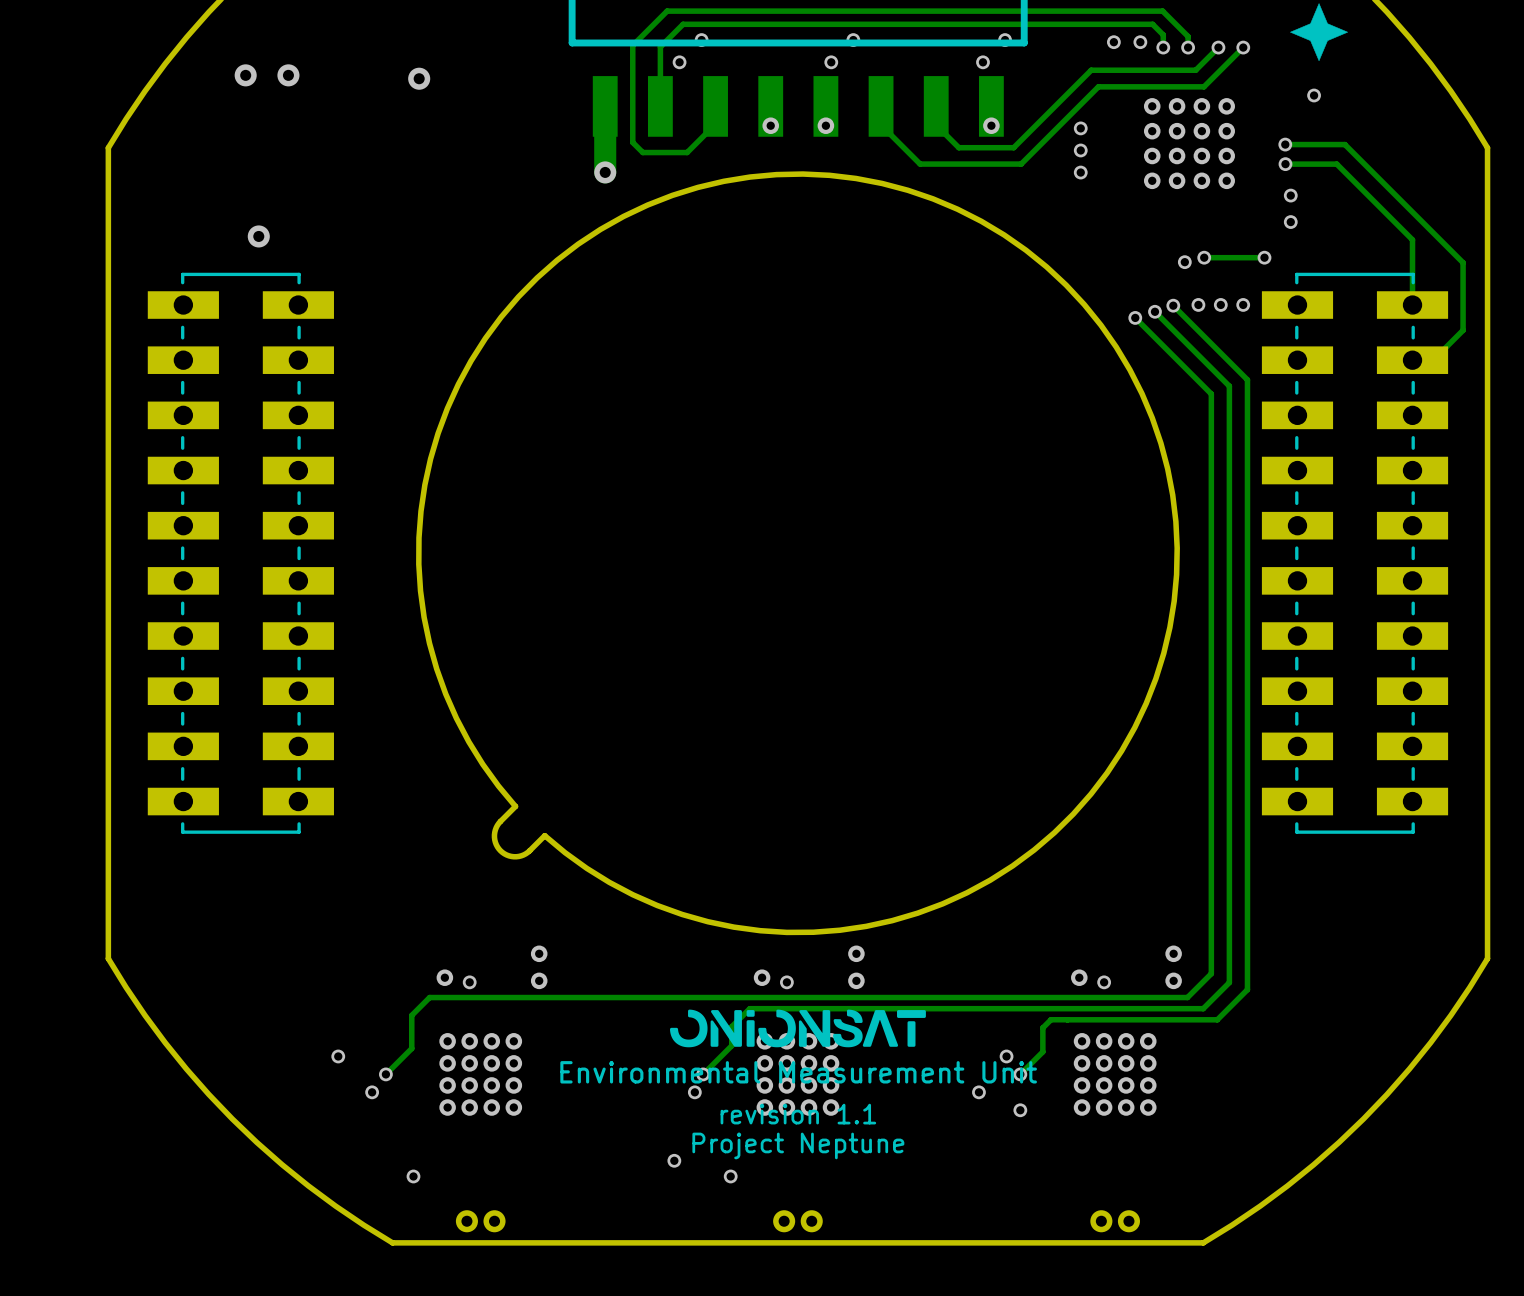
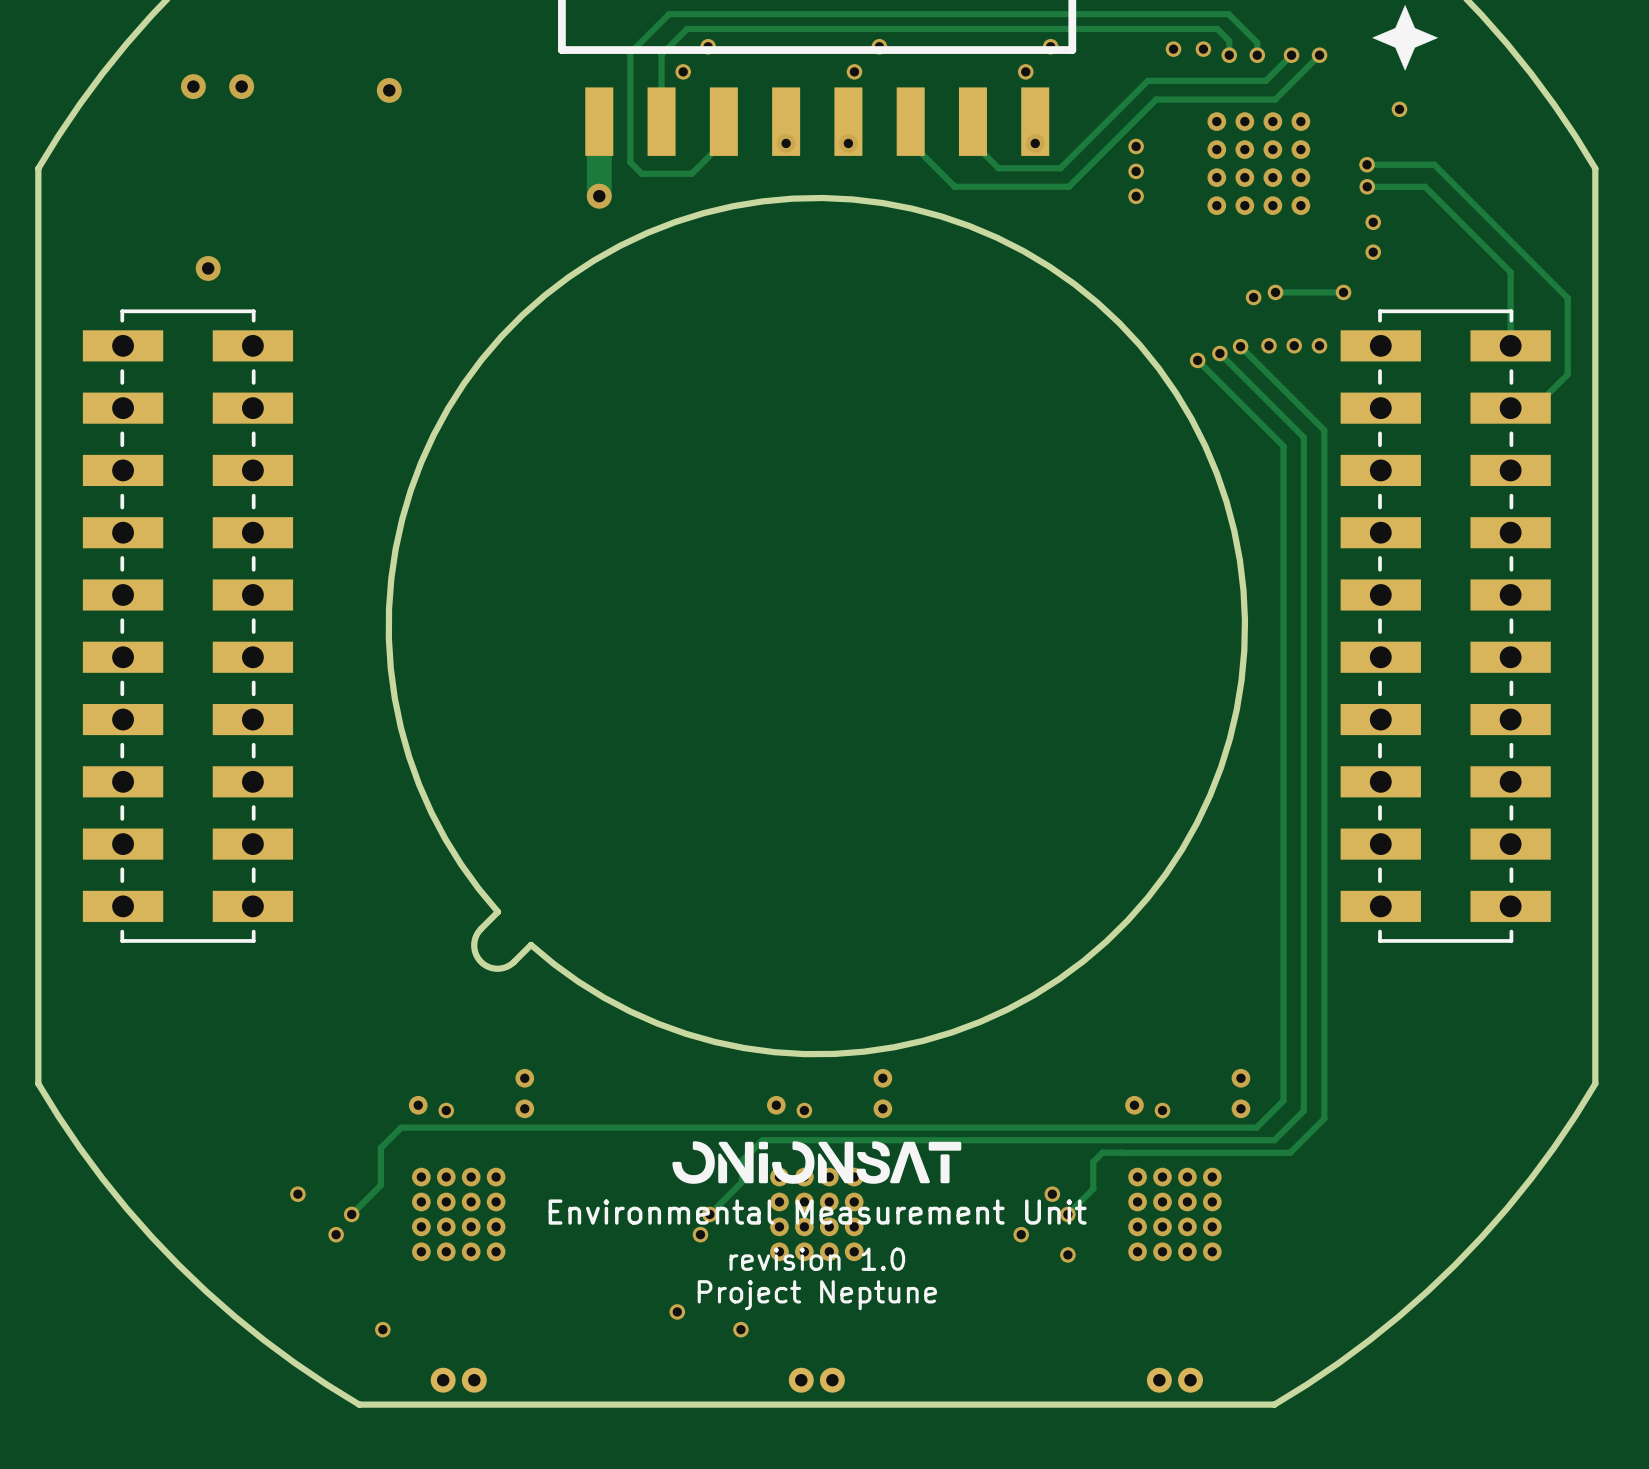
text: revision 1.1 (798, 1114) -> revision 1.0 (817, 1259)

